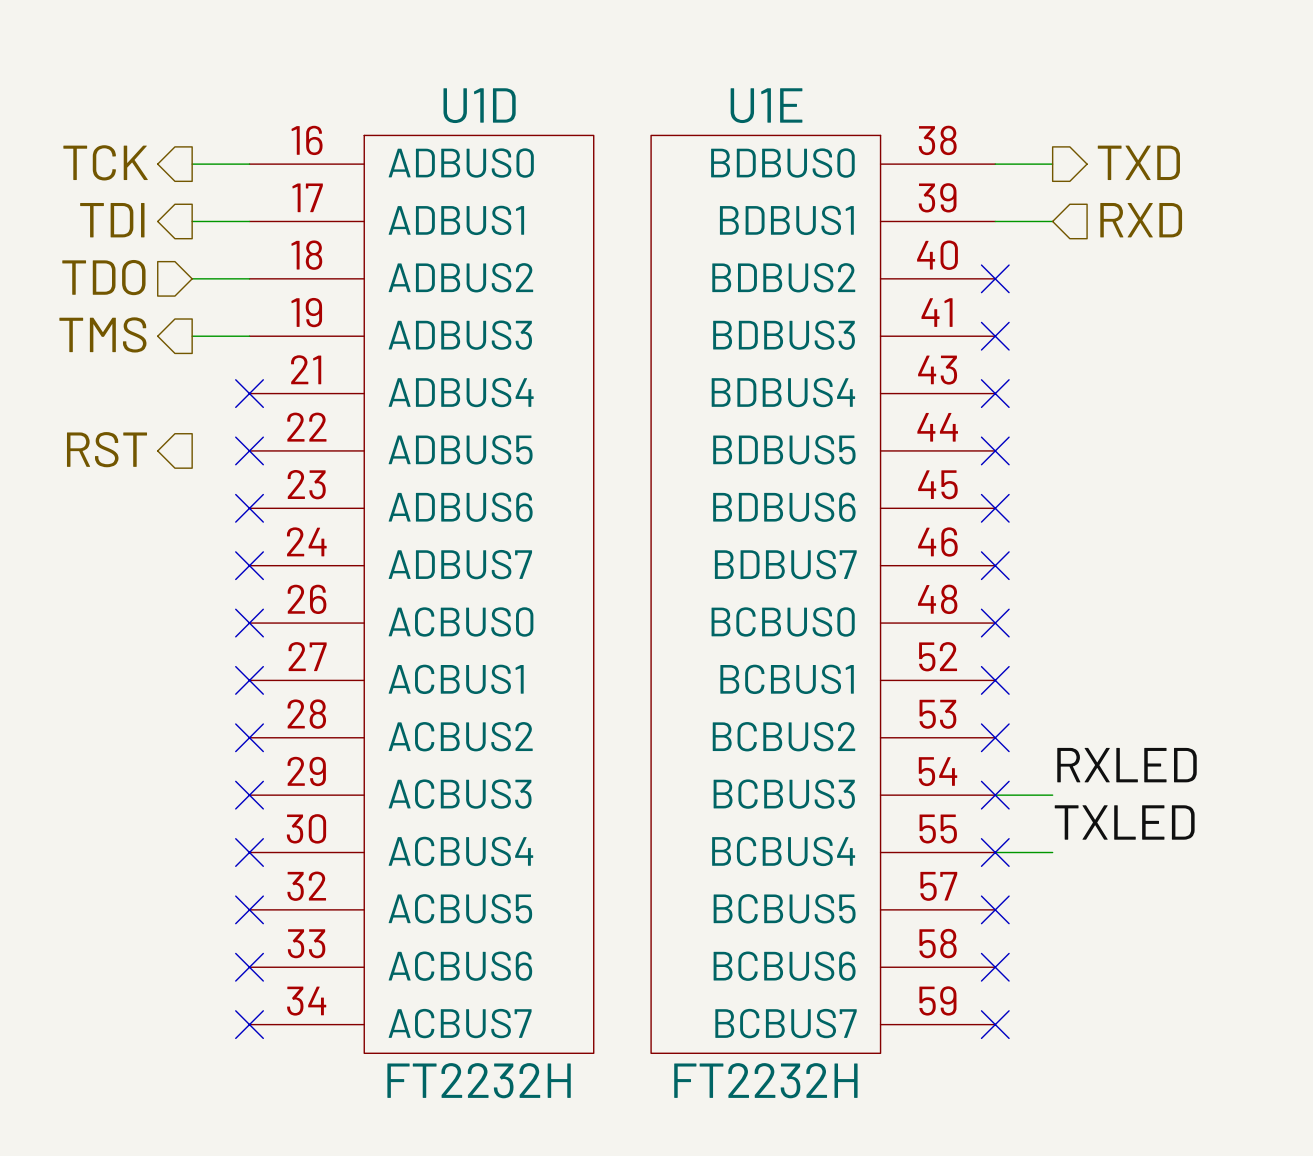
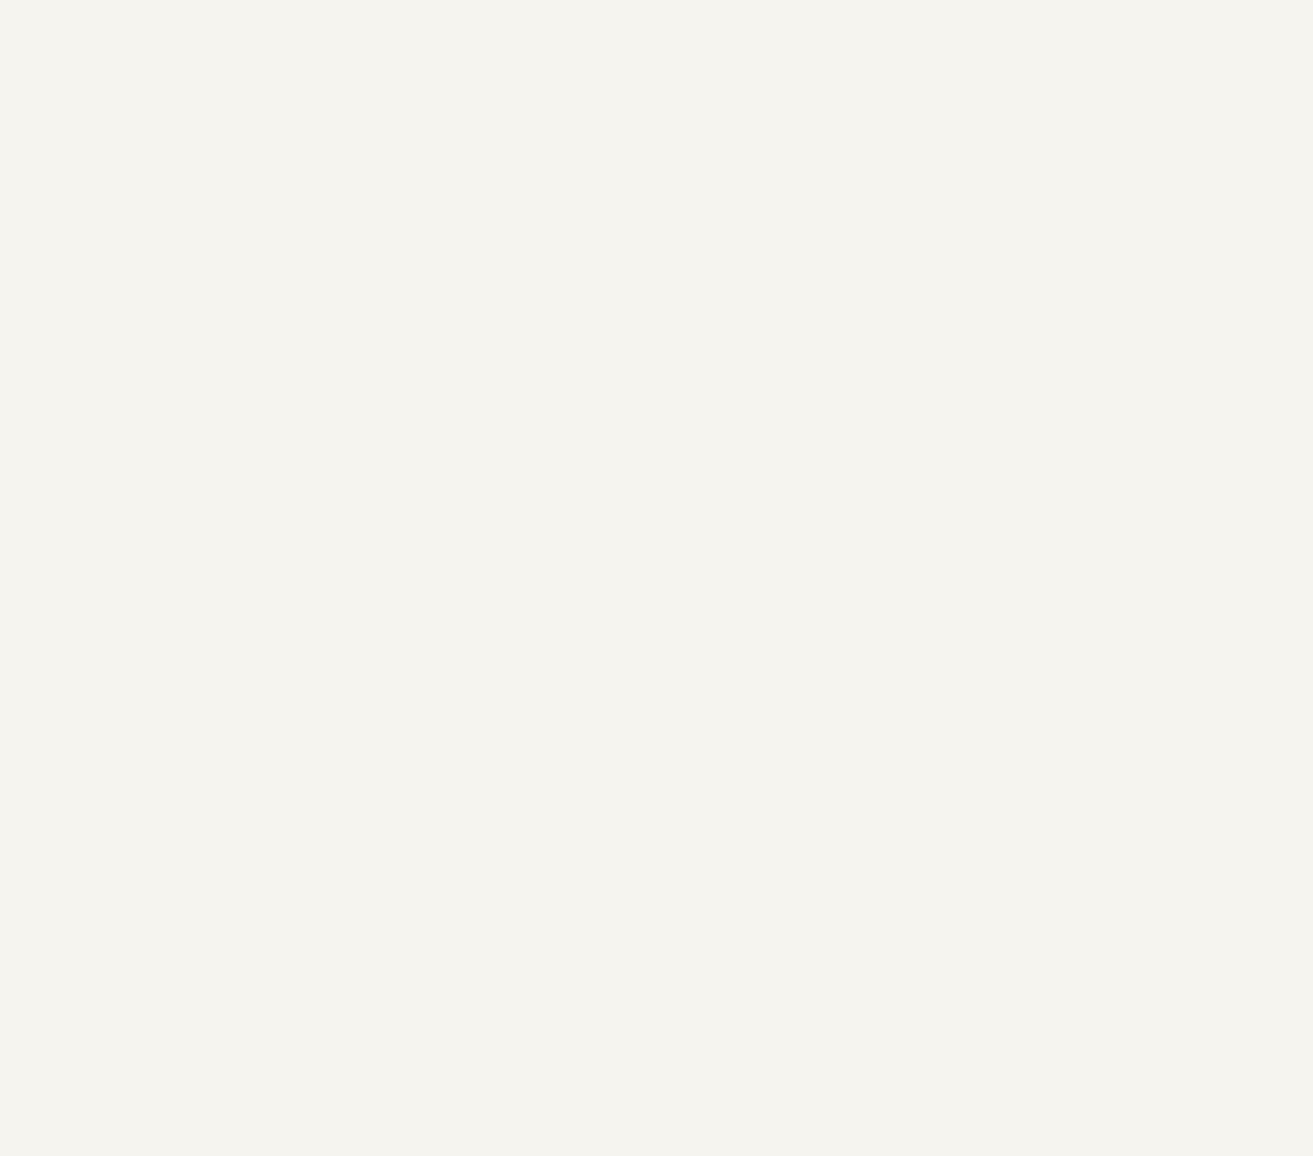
hierarchical label: TCK (105, 162) -> none
hierarchical label: TXD (1138, 162) -> none
wire: (192, 164) (249, 164) -> none
wire: (995, 164) (1052, 164) -> none
hierarchical label: TDI (112, 220) -> none
hierarchical label: RXD (1141, 220) -> none
wire: (192, 221) (249, 221) -> none
wire: (995, 221) (1052, 221) -> none
hierarchical label: TDO (103, 277) -> none
wire: (192, 278) (249, 278) -> none
no-connect mark: (995, 278) -> none
hierarchical label: TMS (102, 334) -> none
wire: (192, 336) (249, 336) -> none
no-connect mark: (995, 336) -> none
no-connect mark: (249, 393) -> none
no-connect mark: (995, 393) -> none
hierarchical label: RST (106, 449) -> none
no-connect mark: (249, 450) -> none
no-connect mark: (995, 450) -> none
no-connect mark: (249, 508) -> none
no-connect mark: (995, 508) -> none
no-connect mark: (249, 565) -> none
no-connect mark: (995, 565) -> none
U1D: FT2232H (421, 594) -> none
U1E: FT2232H (823, 594) -> none
no-connect mark: (249, 623) -> none
no-connect mark: (995, 623) -> none
no-connect mark: (249, 680) -> none
no-connect mark: (995, 680) -> none
no-connect mark: (249, 737) -> none
no-connect mark: (995, 737) -> none
label: RXLED (1127, 765) -> none
no-connect mark: (249, 795) -> none
wire: (995, 795) (1052, 795) -> none
no-connect mark: (995, 795) -> none
label: TXLED (1124, 822) -> none
no-connect mark: (249, 852) -> none
wire: (995, 852) (1052, 852) -> none
no-connect mark: (995, 852) -> none
no-connect mark: (249, 909) -> none
no-connect mark: (995, 909) -> none
no-connect mark: (249, 967) -> none
no-connect mark: (995, 967) -> none
no-connect mark: (249, 1024) -> none
no-connect mark: (995, 1024) -> none

